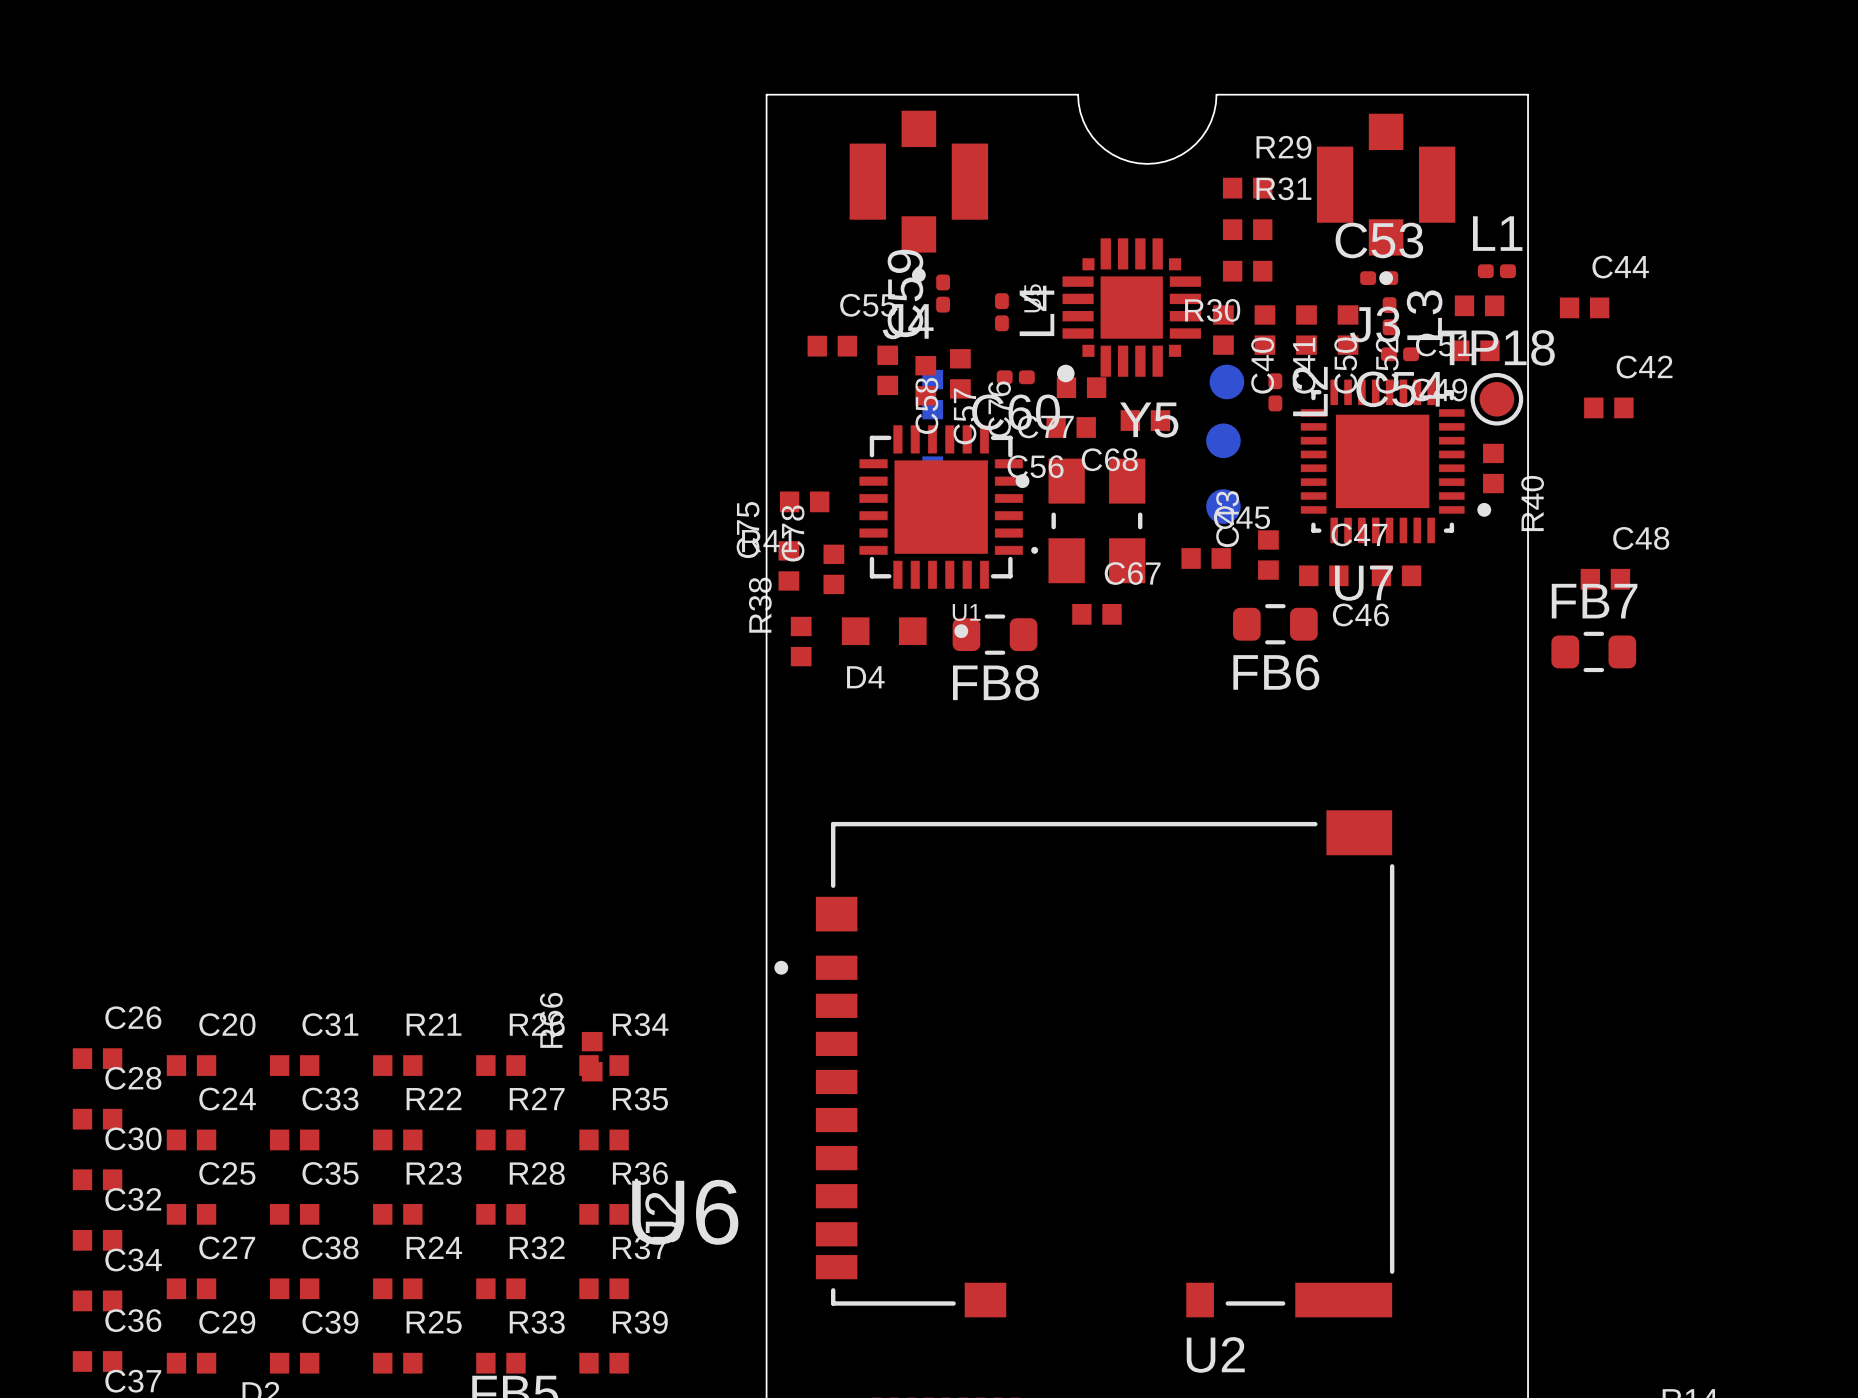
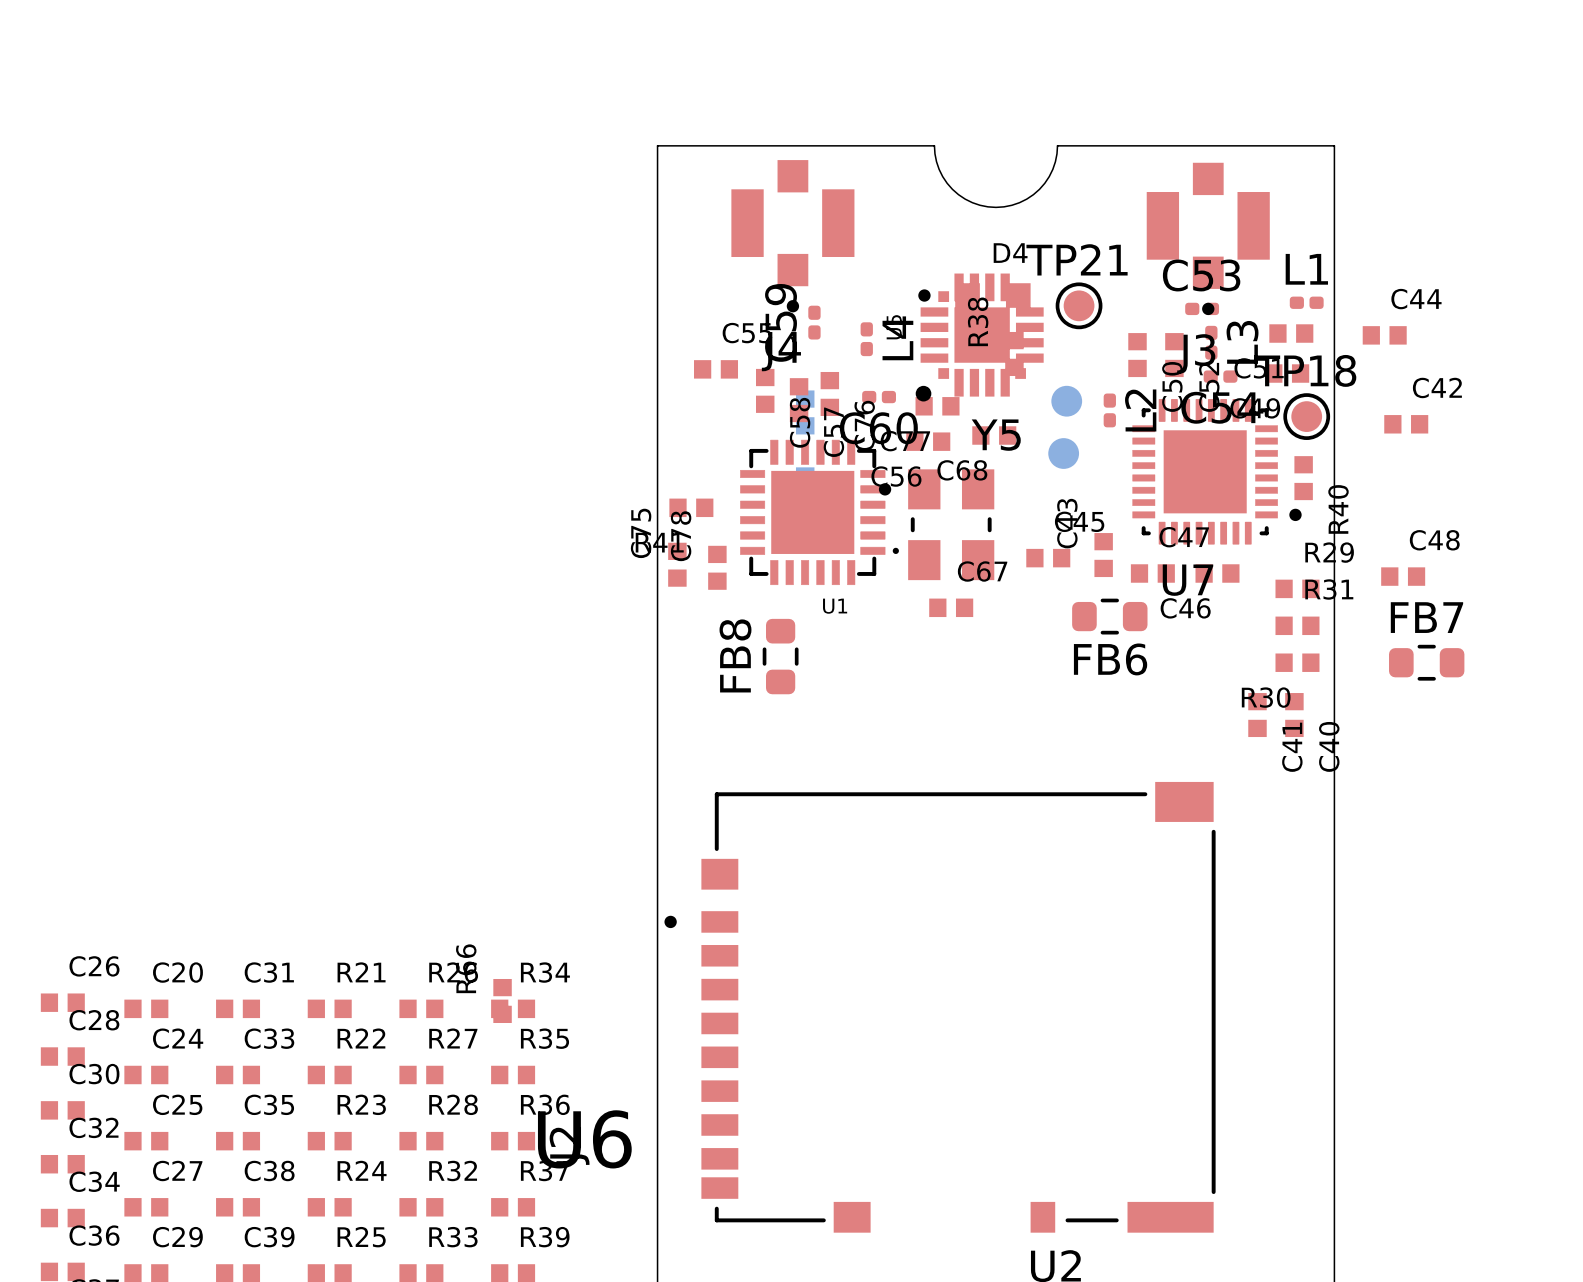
R29 position: (1247, 188) -> (1297, 588)
R31 position: (1247, 229) -> (1297, 625)
R30 position: (1247, 271) -> (1297, 662)
C40 position: (1223, 330) -> (1294, 715)
C41 position: (1264, 330) -> (1257, 715)
TP21 side: bottom (1223, 506) -> top (1079, 305)
D4 rotation: 0° (905, 631) -> 180° (974, 295)
D4 position: (905, 631) -> (974, 295)
FB8 rotation: 0° (995, 634) -> 90° clockwise (780, 656)
FB8 position: (995, 634) -> (780, 656)
R38 position: (801, 641) -> (1014, 353)
FB7 position: (1593, 651) -> (1426, 662)

